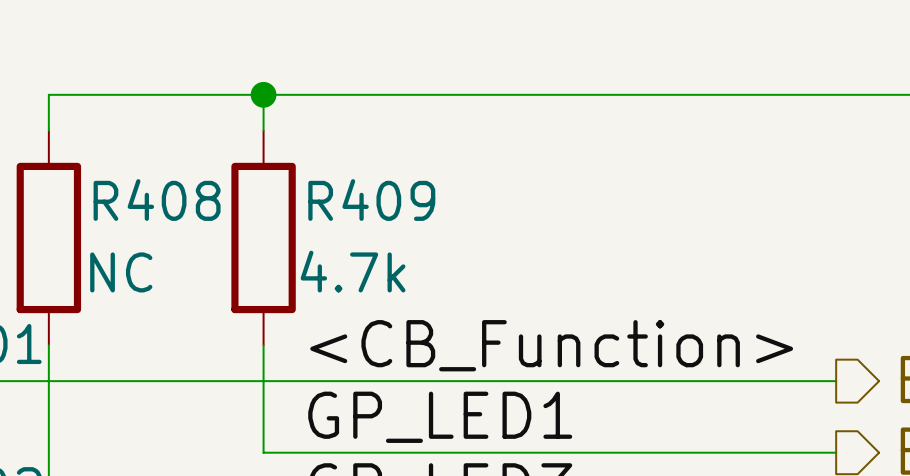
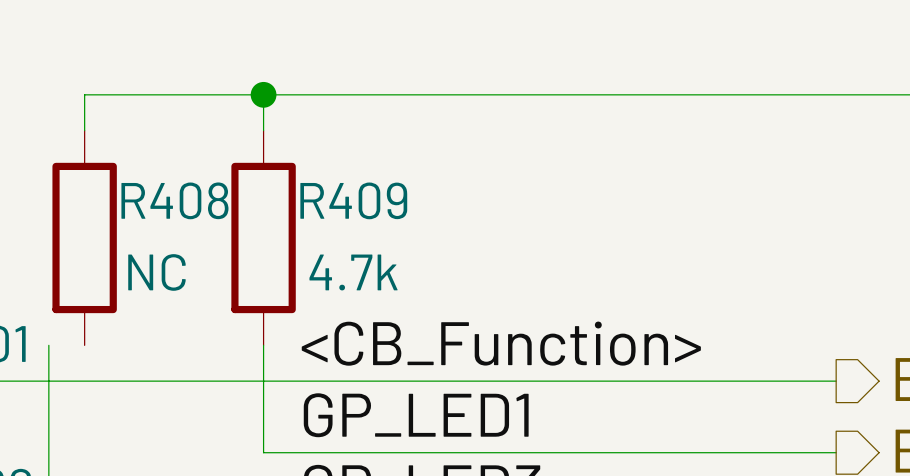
wire: (84, 94) (48, 94) (48, 130) -> (84, 94) (84, 130)
R408 name position: R408 (157, 200) -> R408 (174, 200)
R409 name position: R409 (371, 200) -> R409 (353, 200)
R408 position: (48, 237) -> (84, 237)

